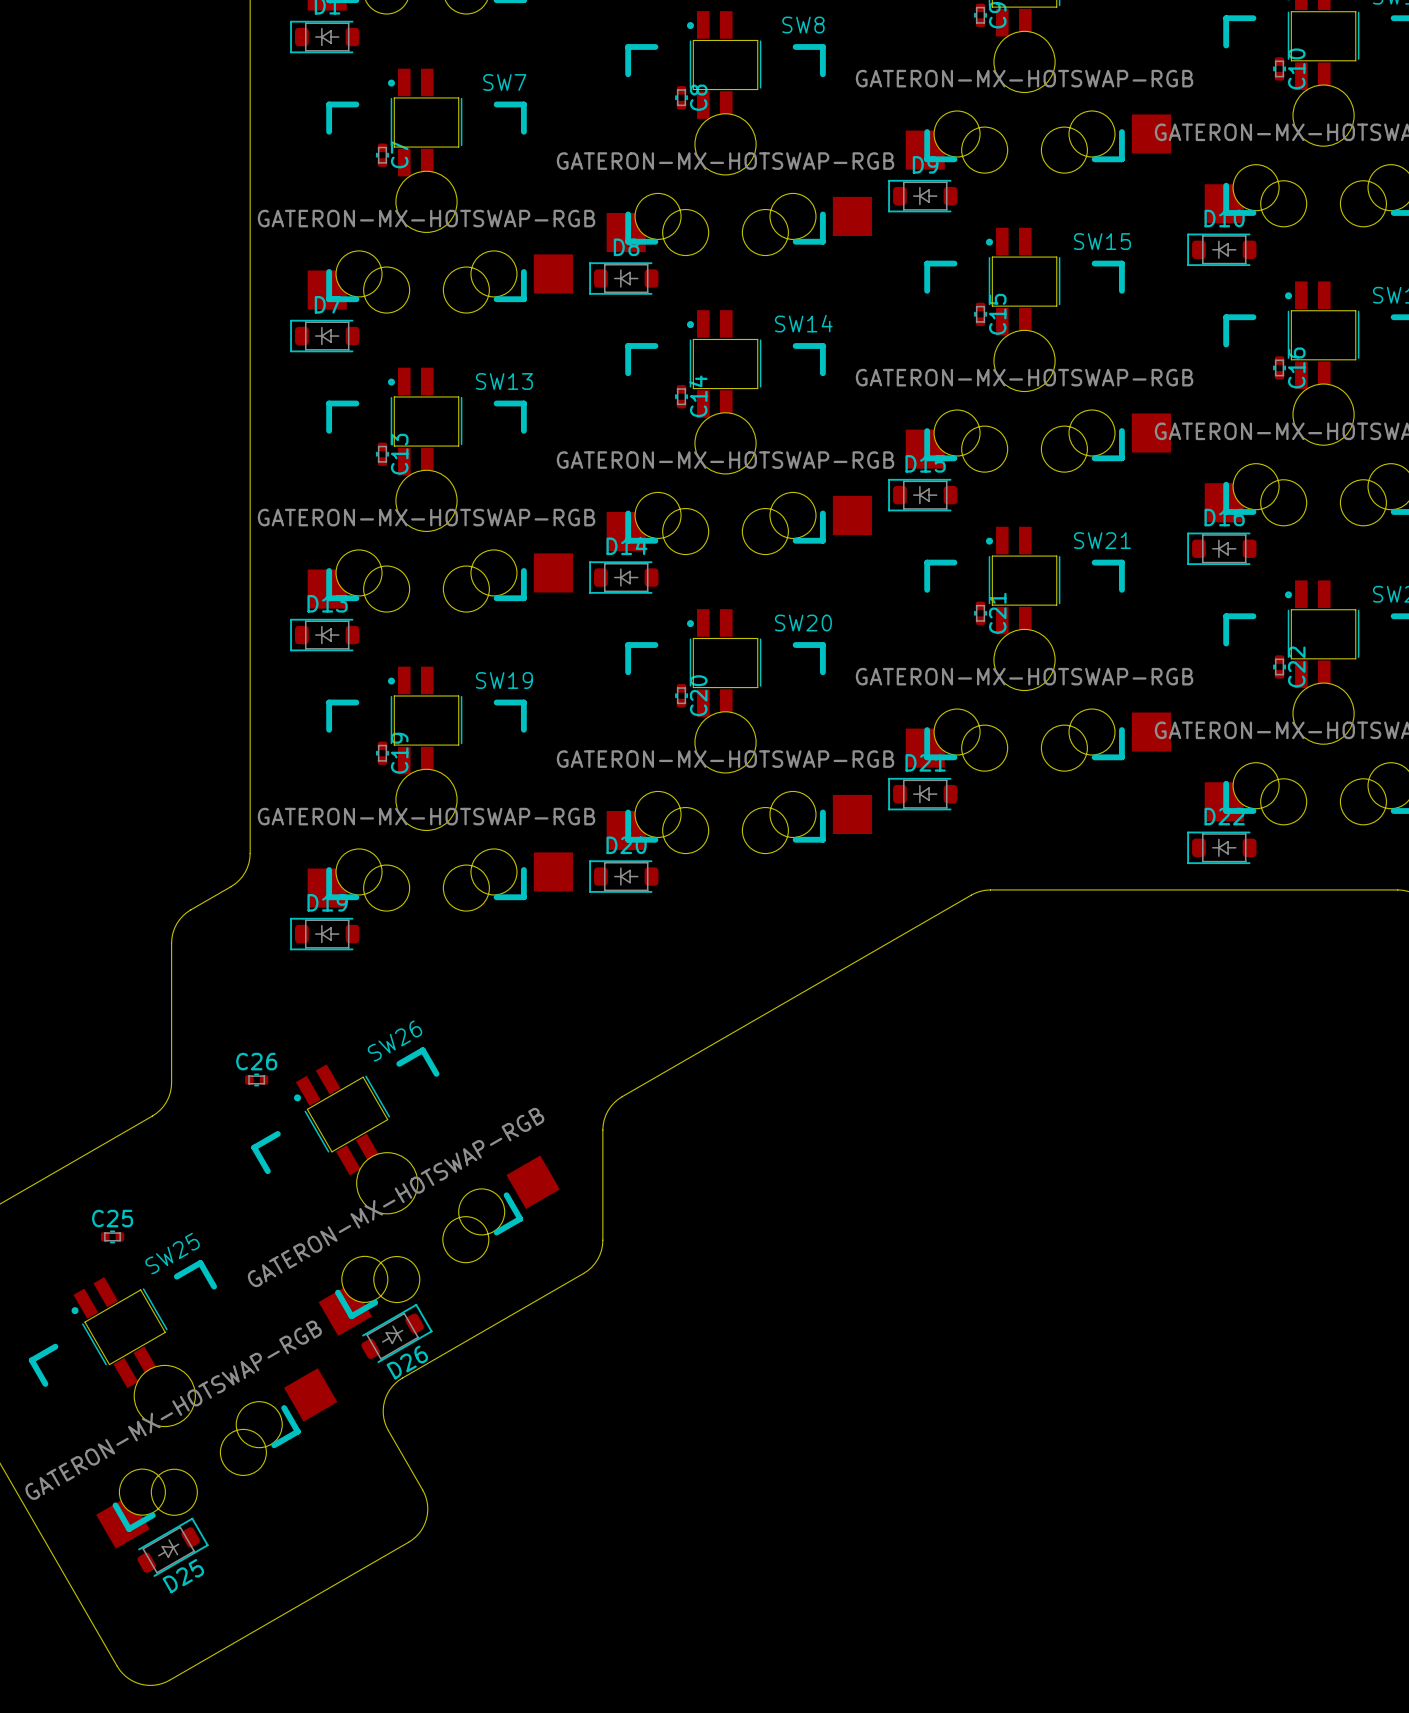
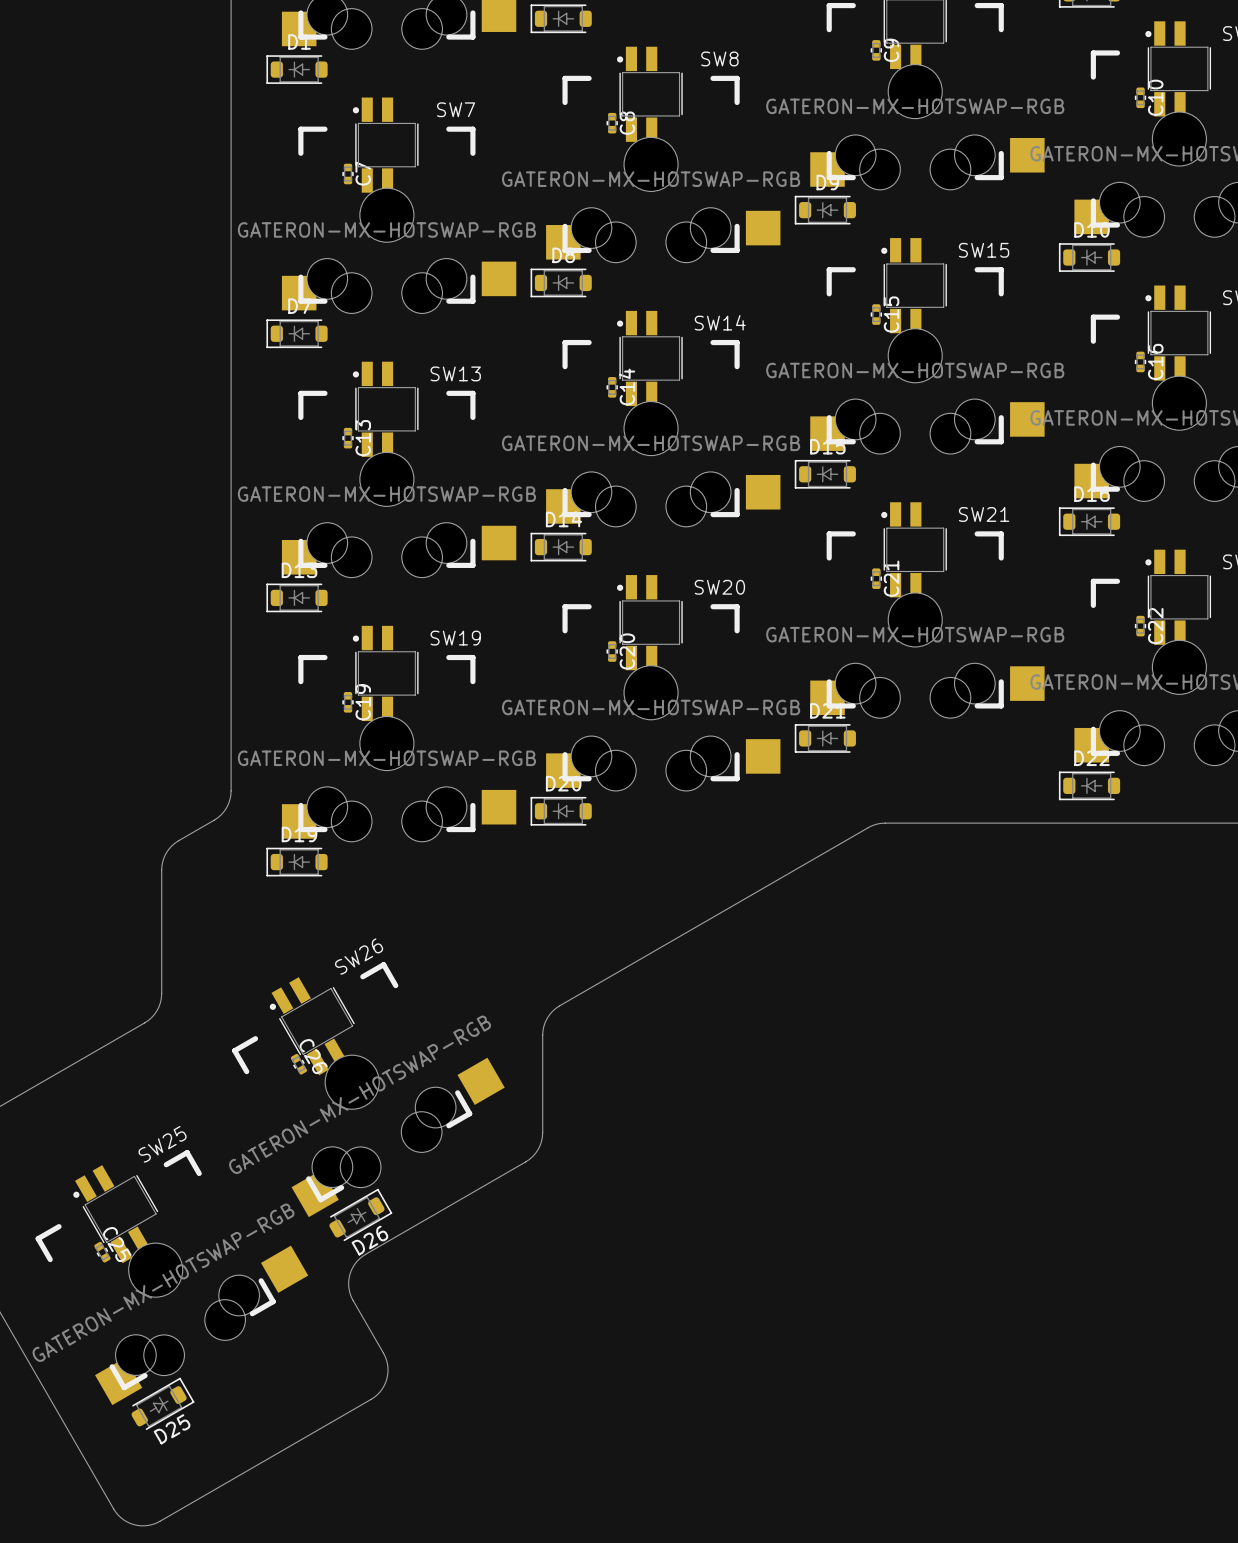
C26 rotation: 0° (256, 1079) -> 60° clockwise (298, 1064)
C26 position: (256, 1079) -> (298, 1064)
C25 rotation: 0° (112, 1236) -> 60° clockwise (102, 1252)
C25 position: (112, 1236) -> (102, 1252)

